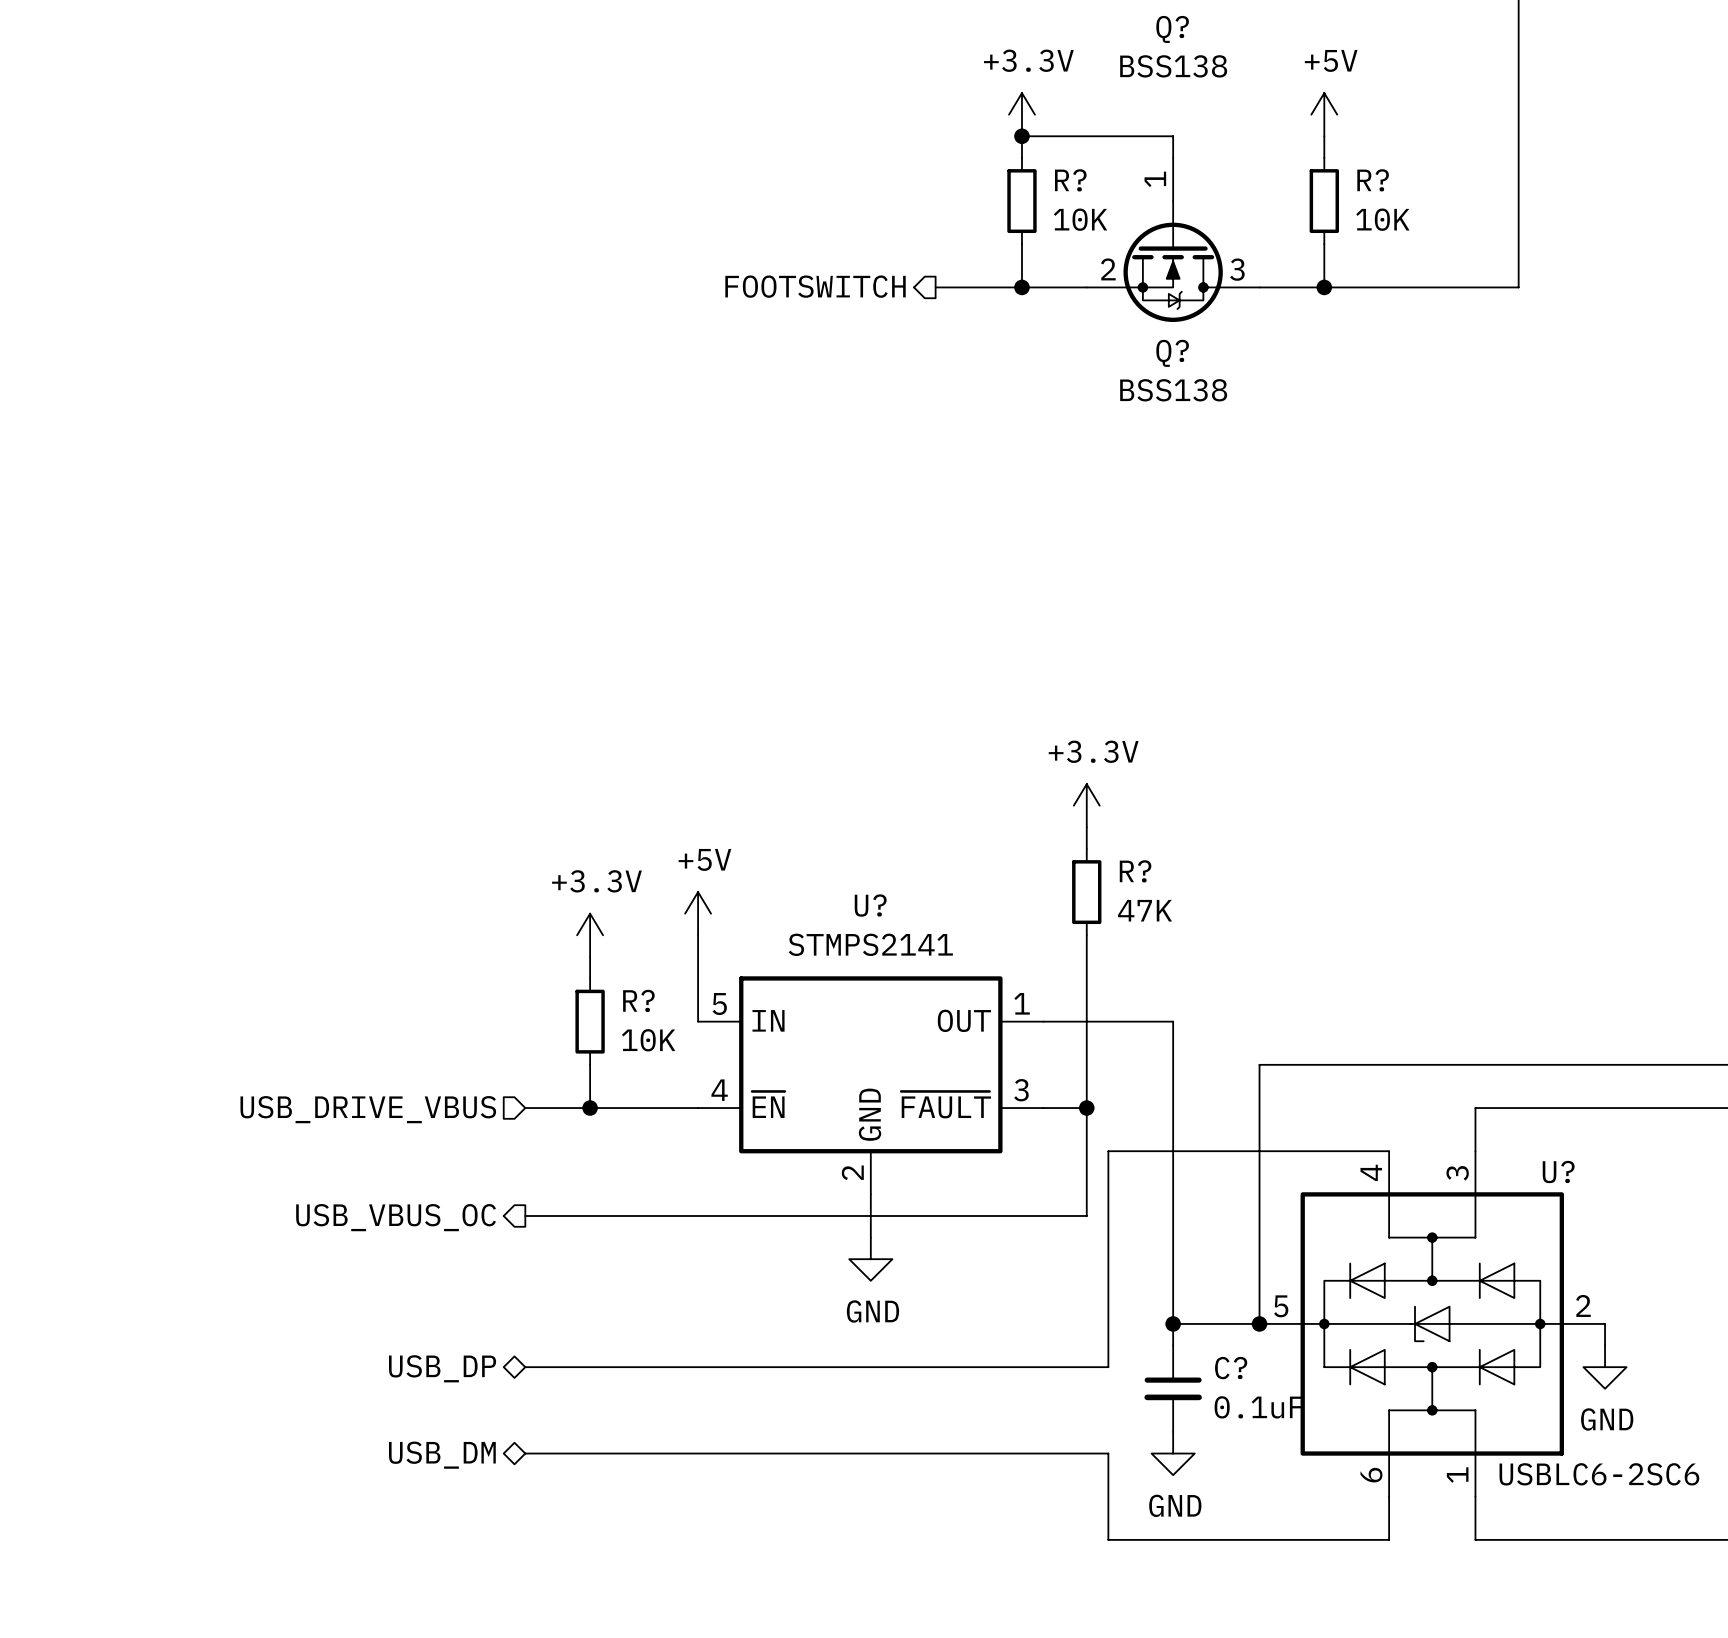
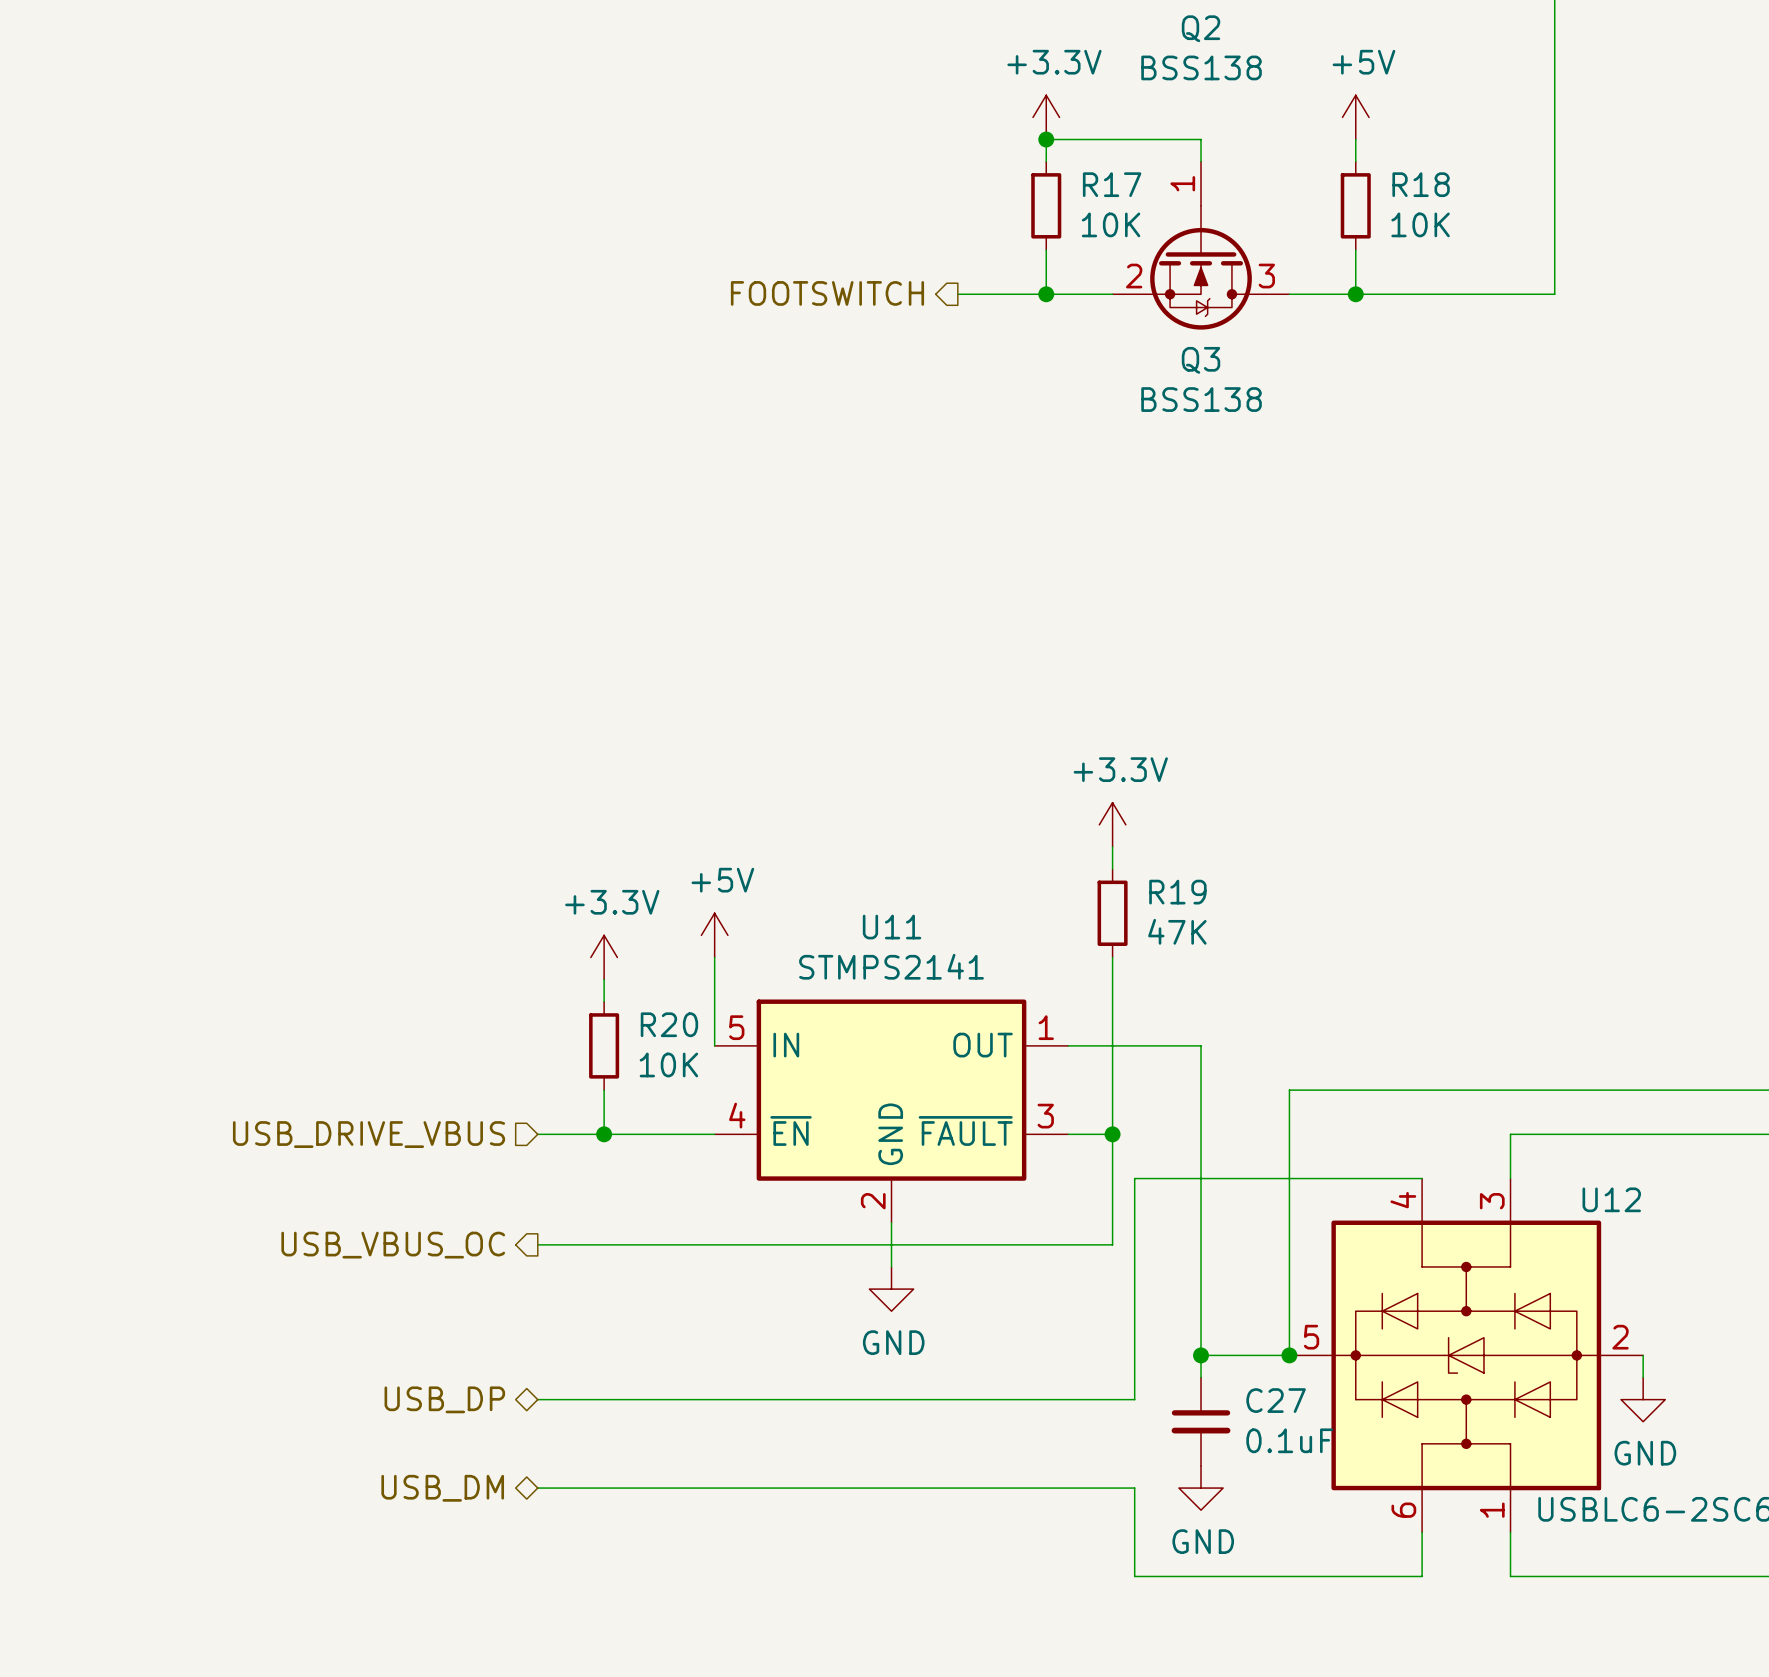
Q? name: Q? (1172, 29) -> Q2 (1201, 28)
R? name: R? (1070, 180) -> R17 (1112, 184)
R? name: R? (1373, 180) -> R18 (1421, 184)
Q? name: Q? (1172, 353) -> Q3 (1201, 360)
R? name: R? (1135, 871) -> R19 (1177, 892)
U? name: U? (870, 905) -> U11 (892, 927)
R? name: R? (638, 1000) -> R20 (669, 1024)
U? name: U? (1558, 1172) -> U12 (1611, 1199)
C? name: C? (1231, 1368) -> C27 (1276, 1400)

